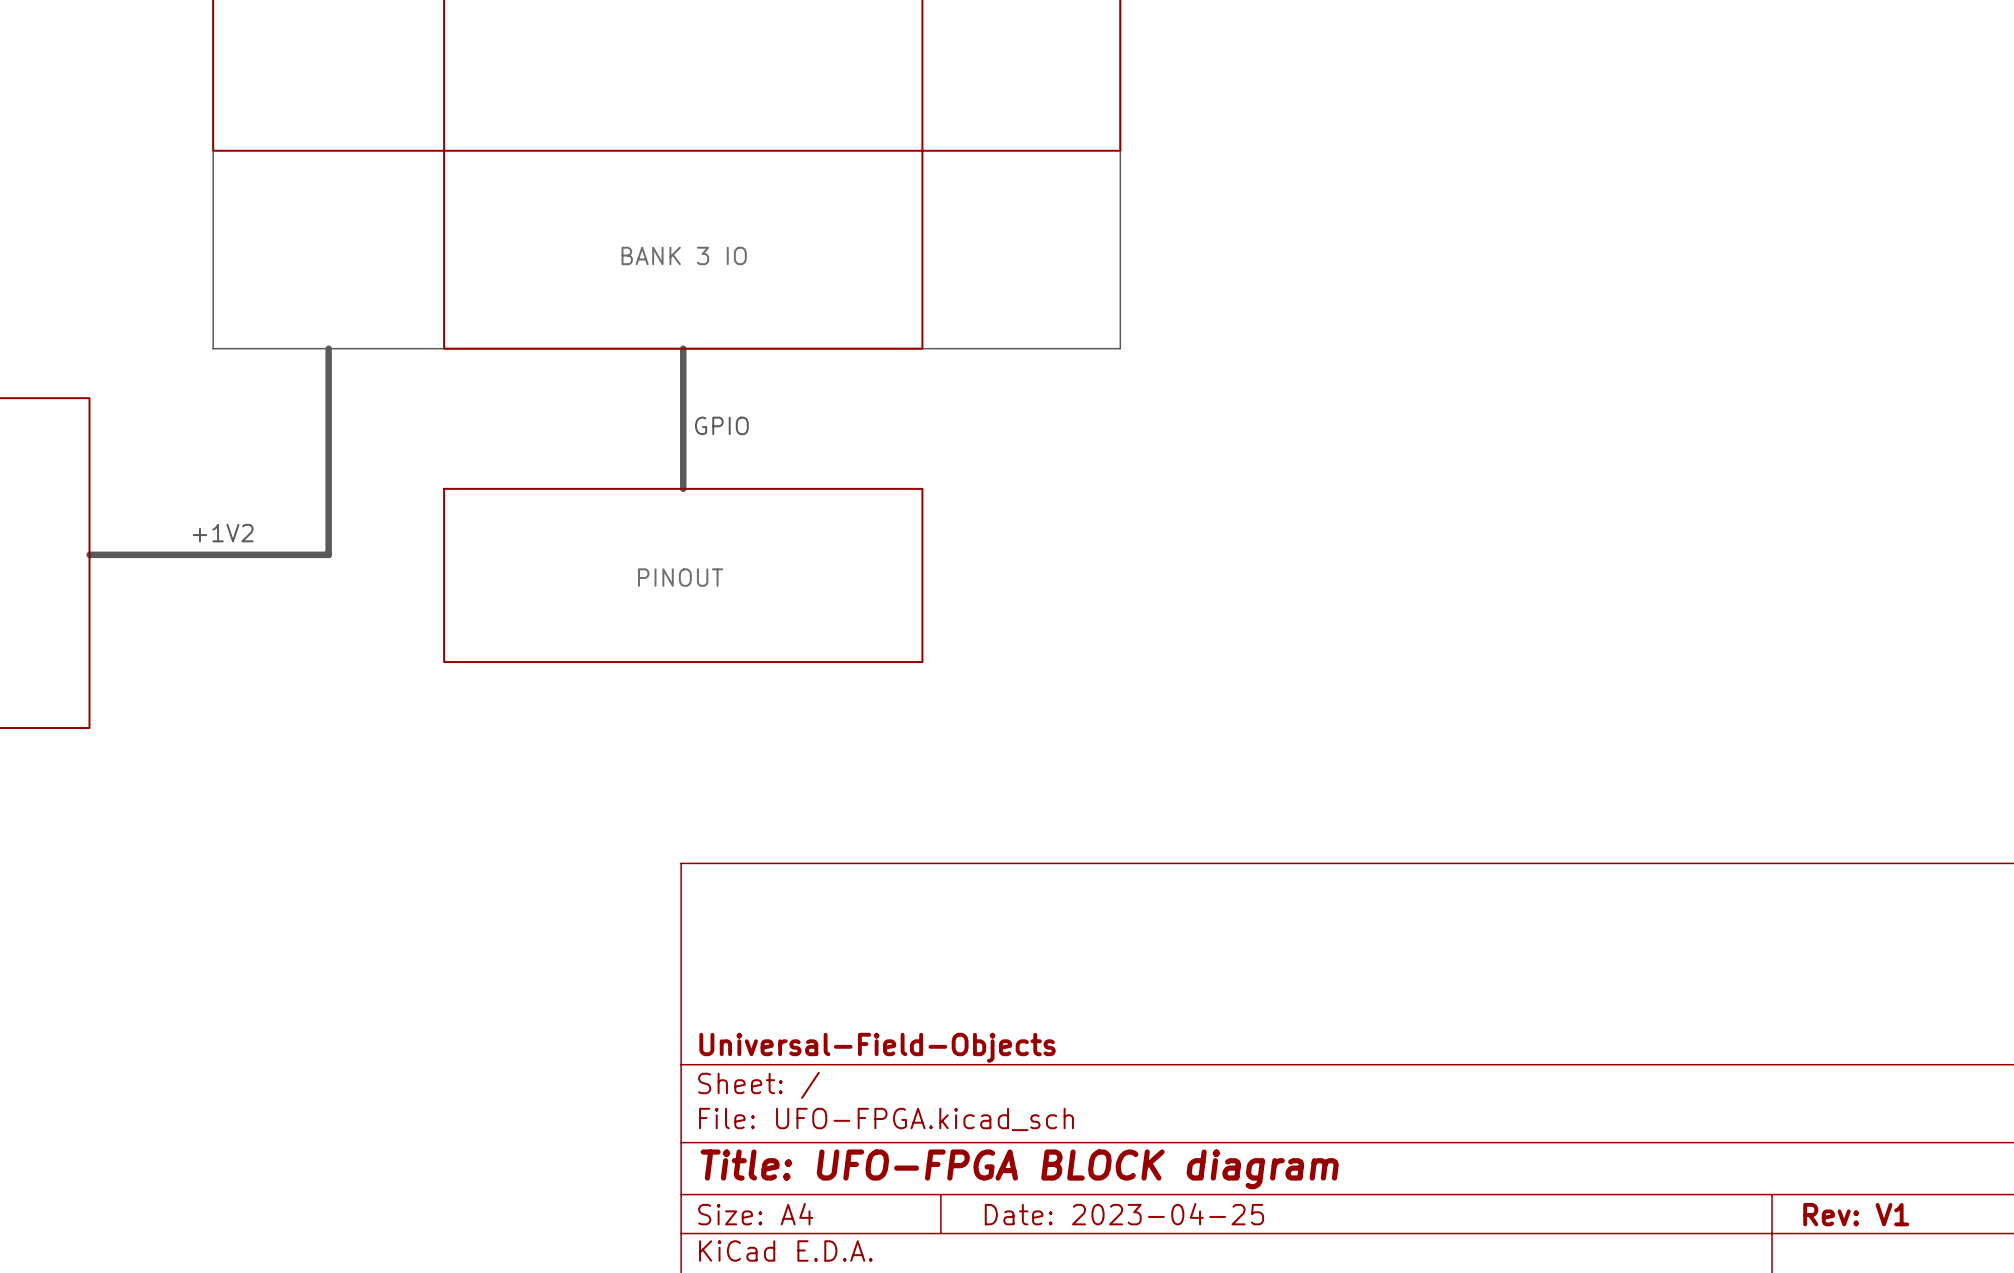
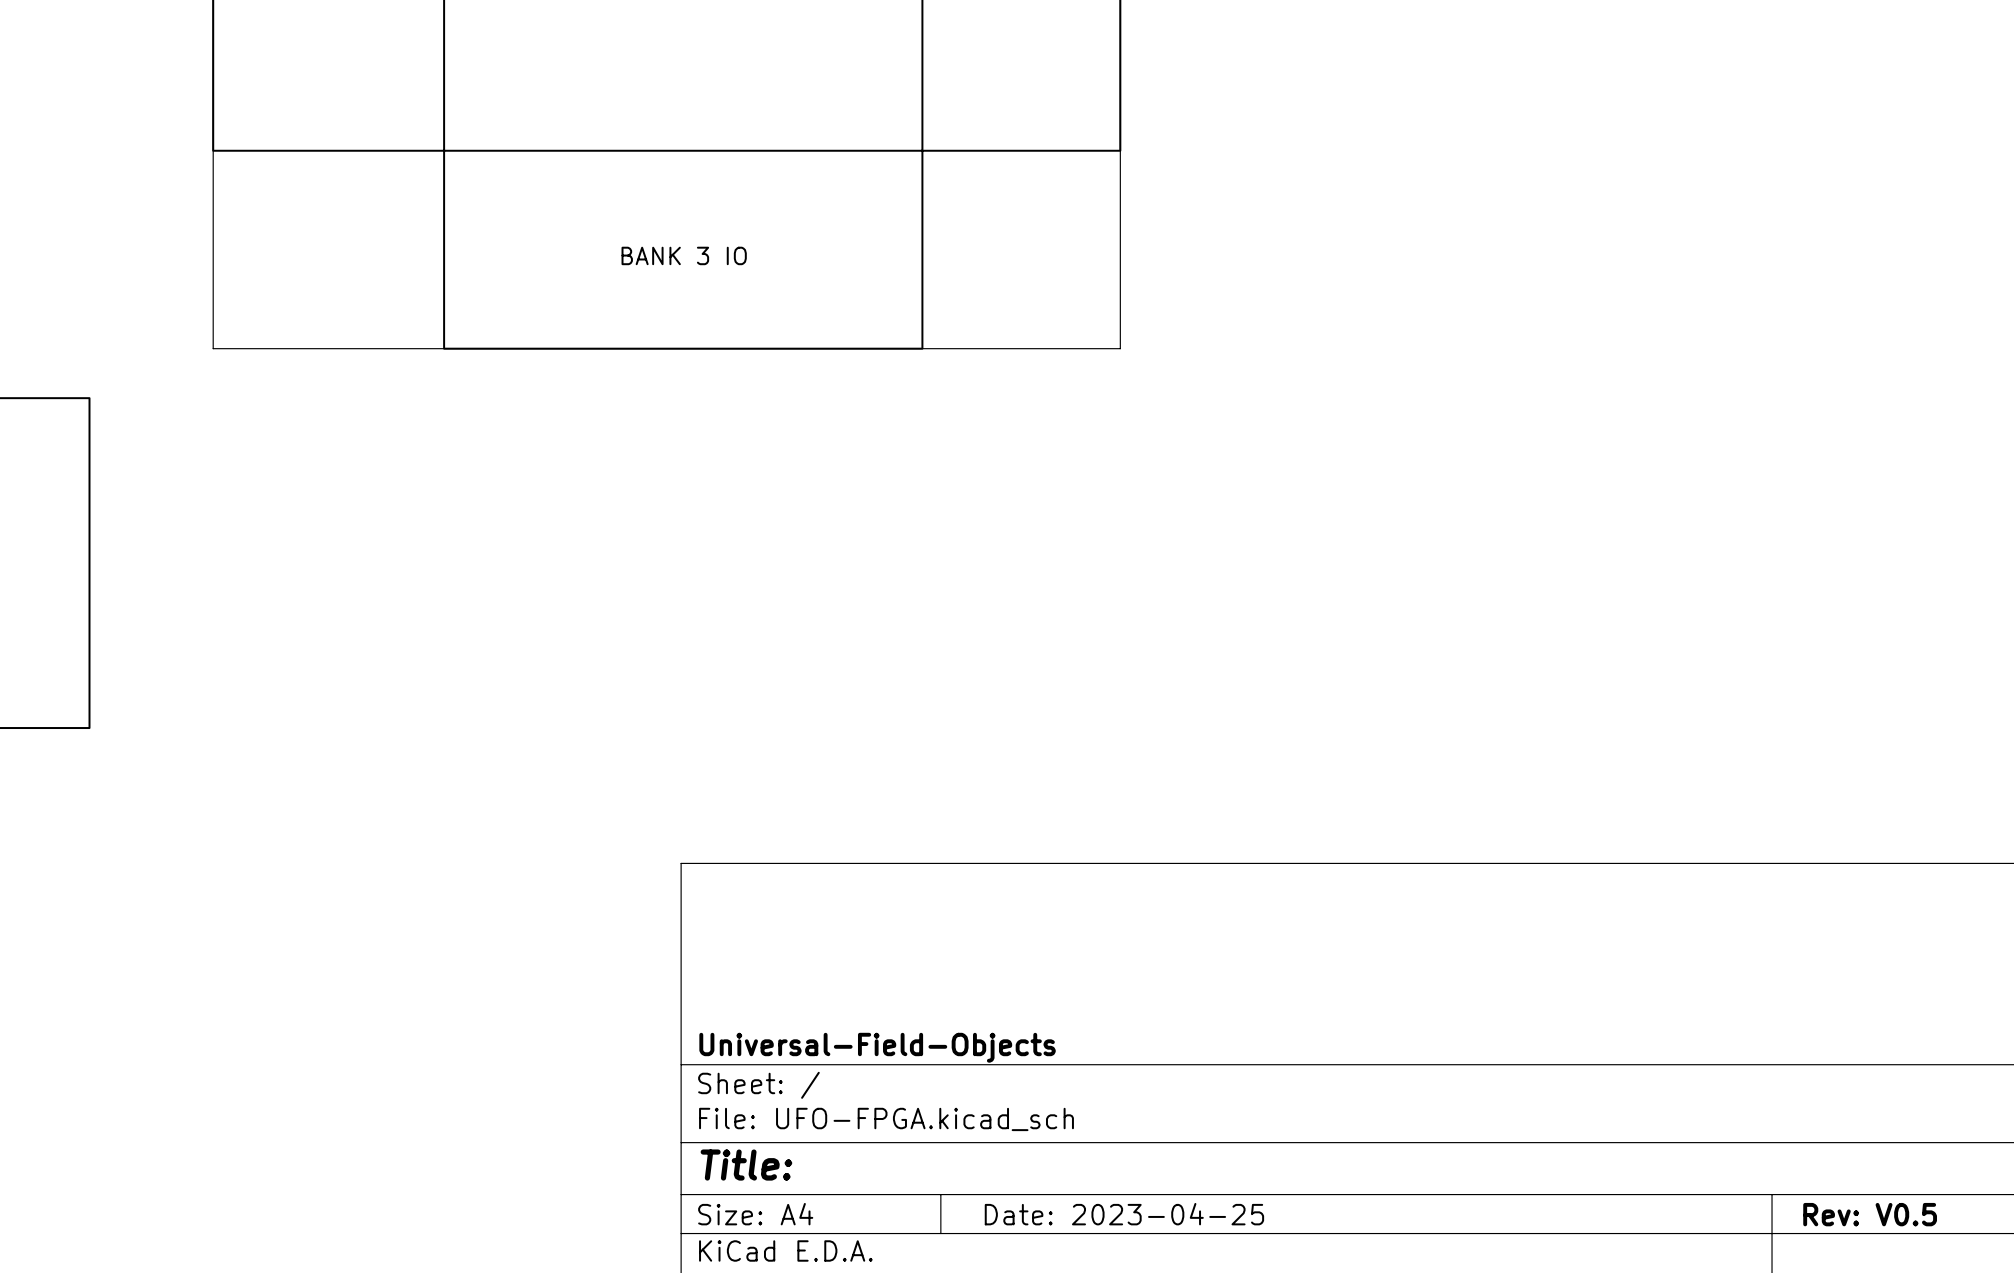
line: (328, 348) (328, 554) (89, 554) -> none
line: (683, 348) (683, 488) -> none
text: GPIO (721, 425) -> none
text: +1V2 (223, 533) -> none
sheet PINOUT: (683, 575) -> none
title block: Title: UFO-FPGA BLOCK diagram (1019, 1169) -> Title: (746, 1165)
title block: Rev: V1 (1856, 1214) -> Rev: V0.5 (1870, 1214)

